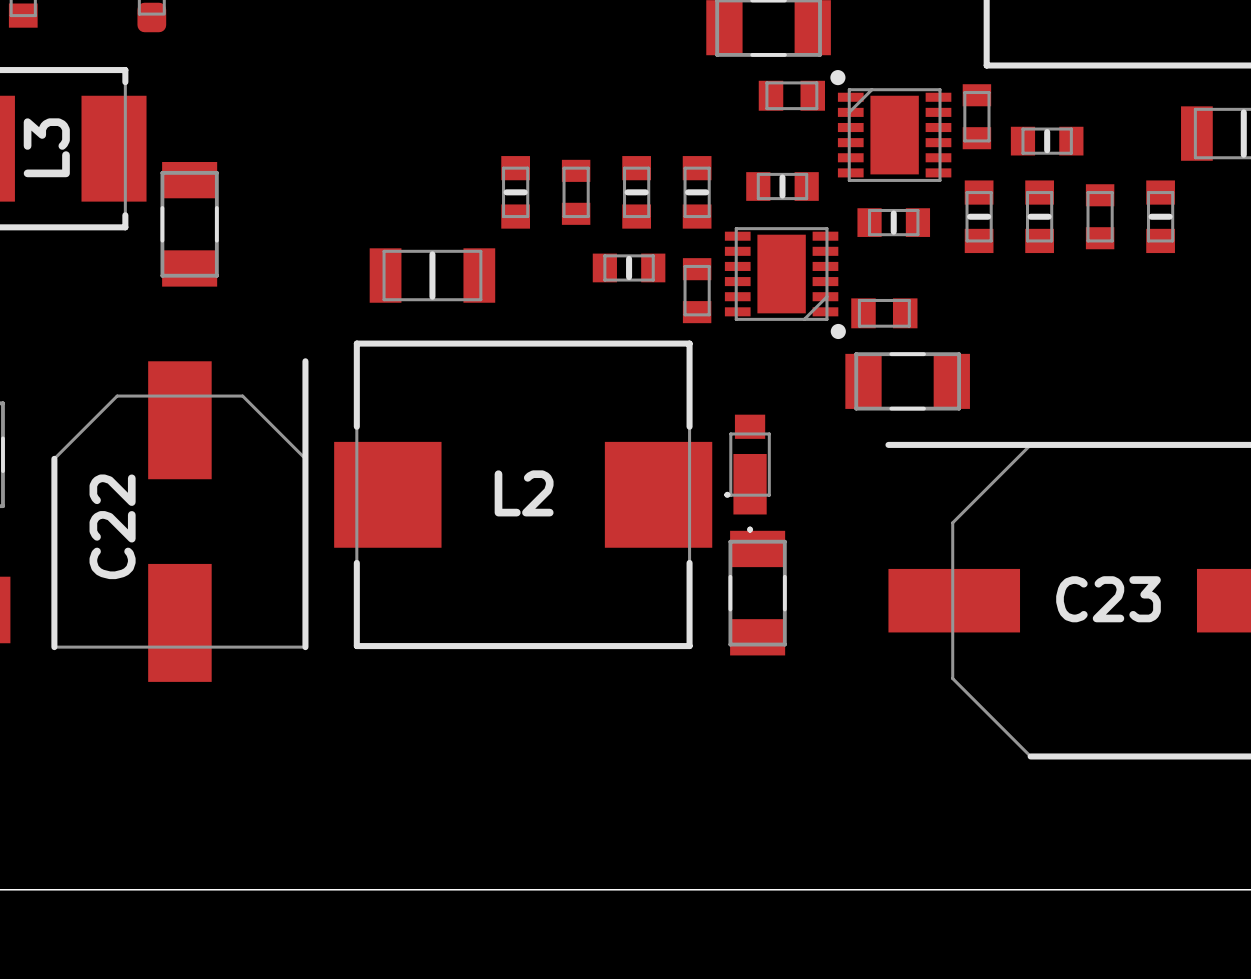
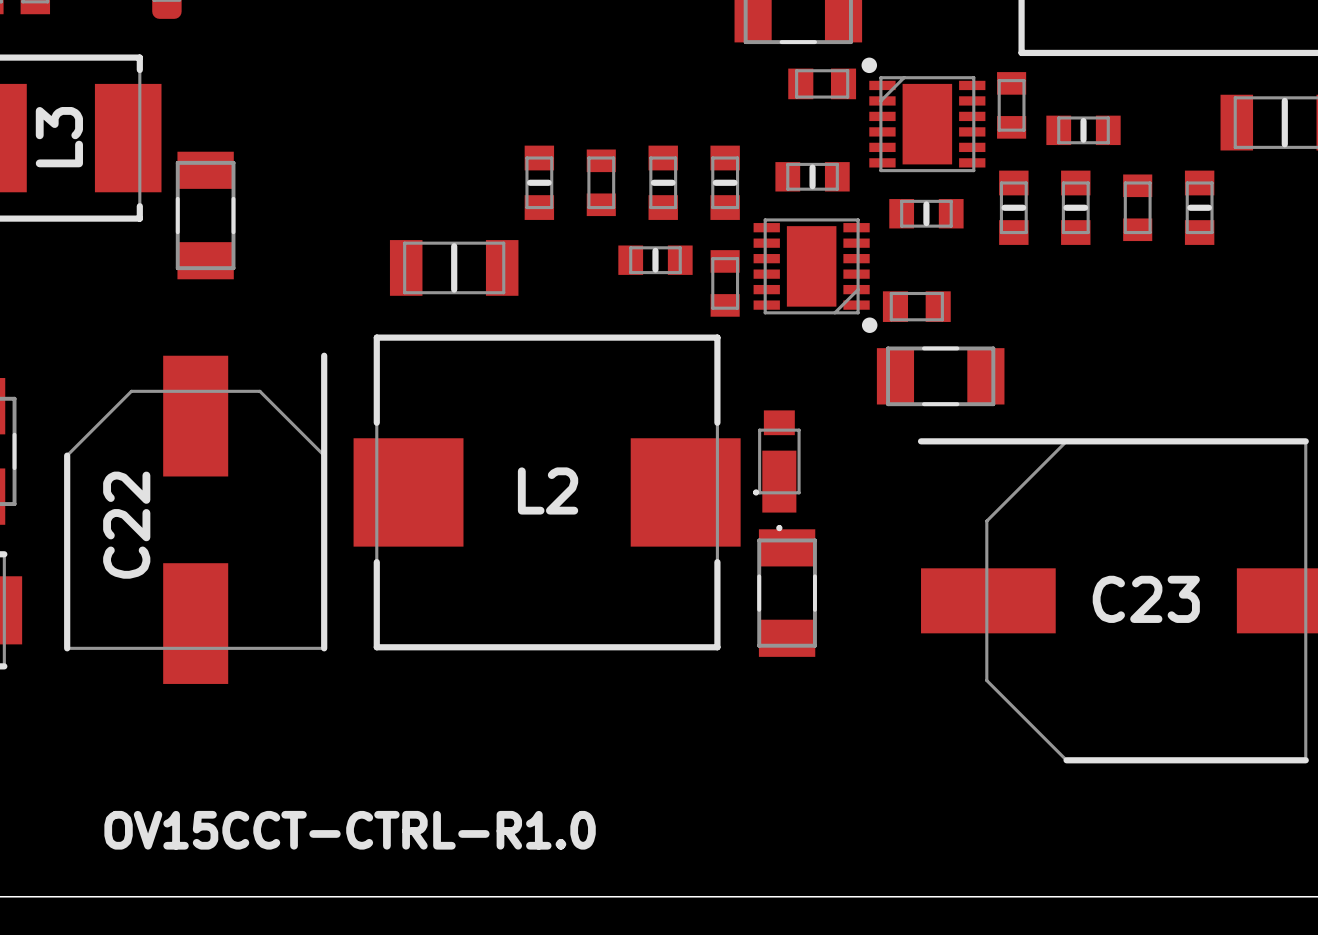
text: none -> OV15CCT-CTRL-R1.0 (350, 830)

